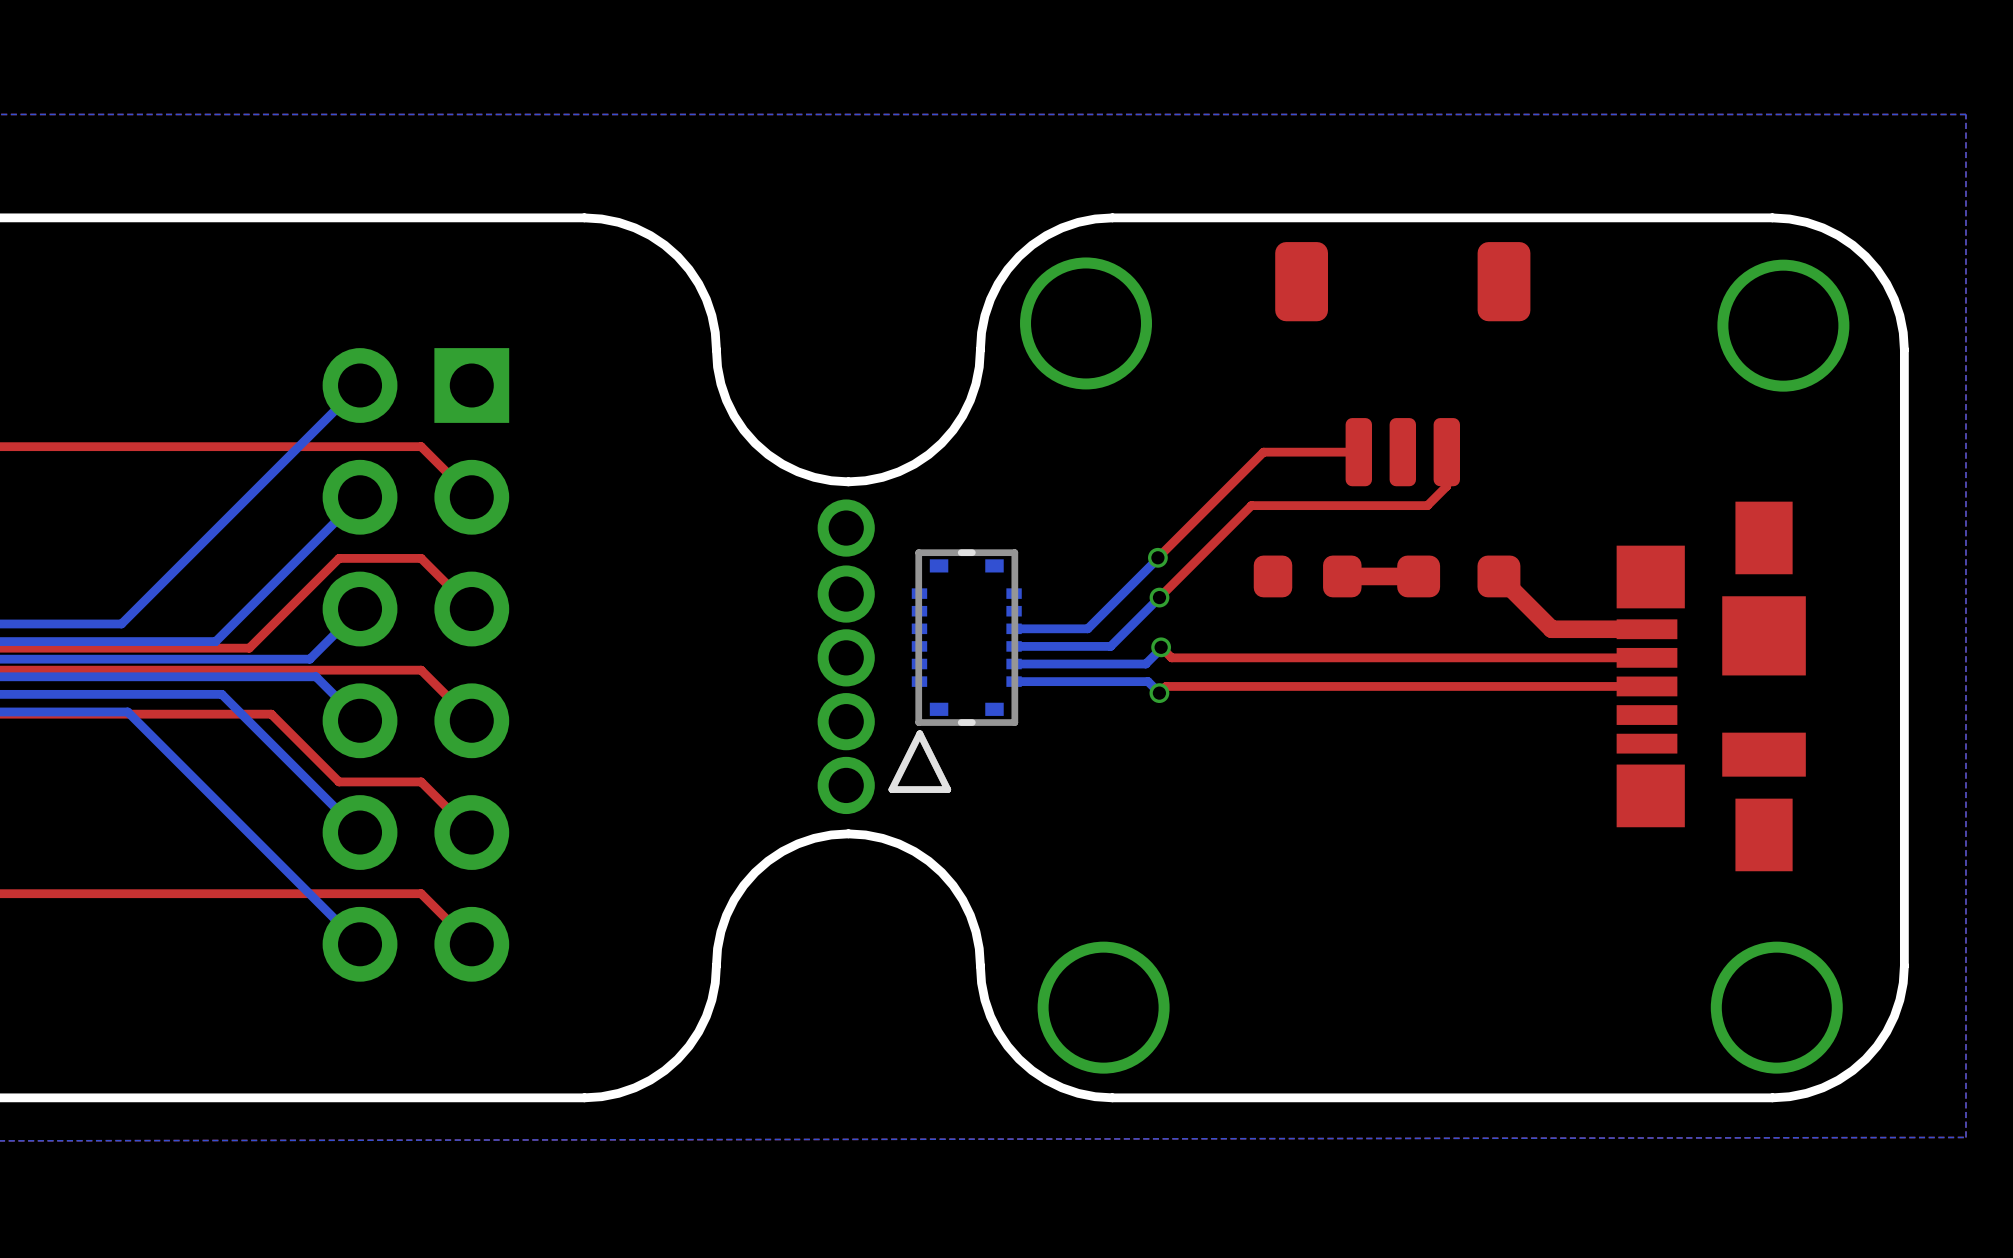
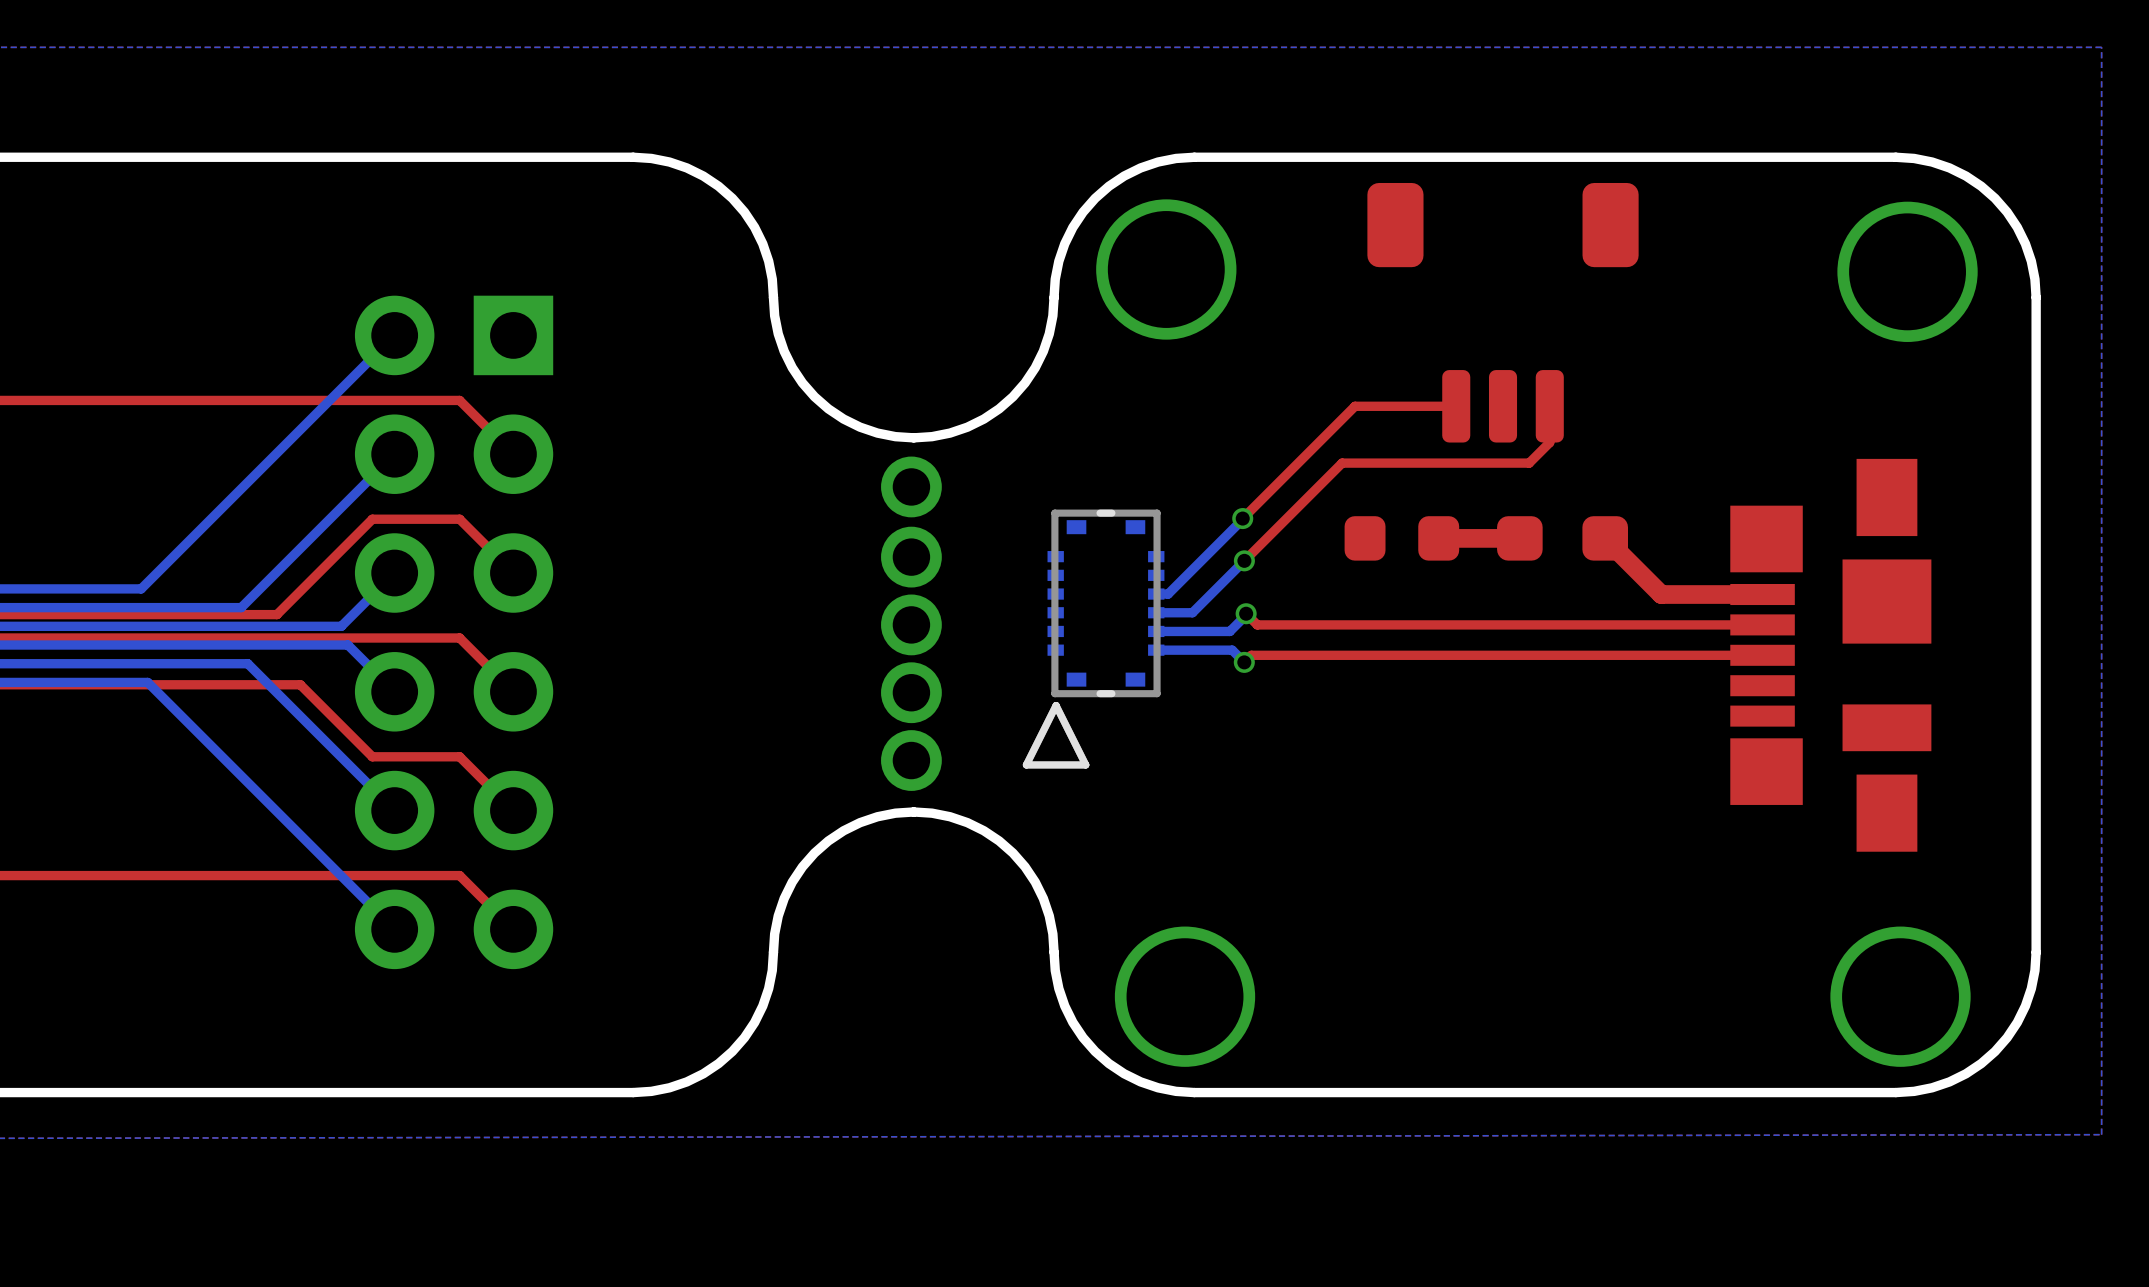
bottom track: (1076, 628) (1014, 628) -> none
bottom track: (1076, 646) (1014, 646) -> none
bottom track: (1076, 664) (1014, 664) -> none
part position: (955, 671) -> (1093, 639)
bottom track: (1076, 681) (1014, 681) -> none

